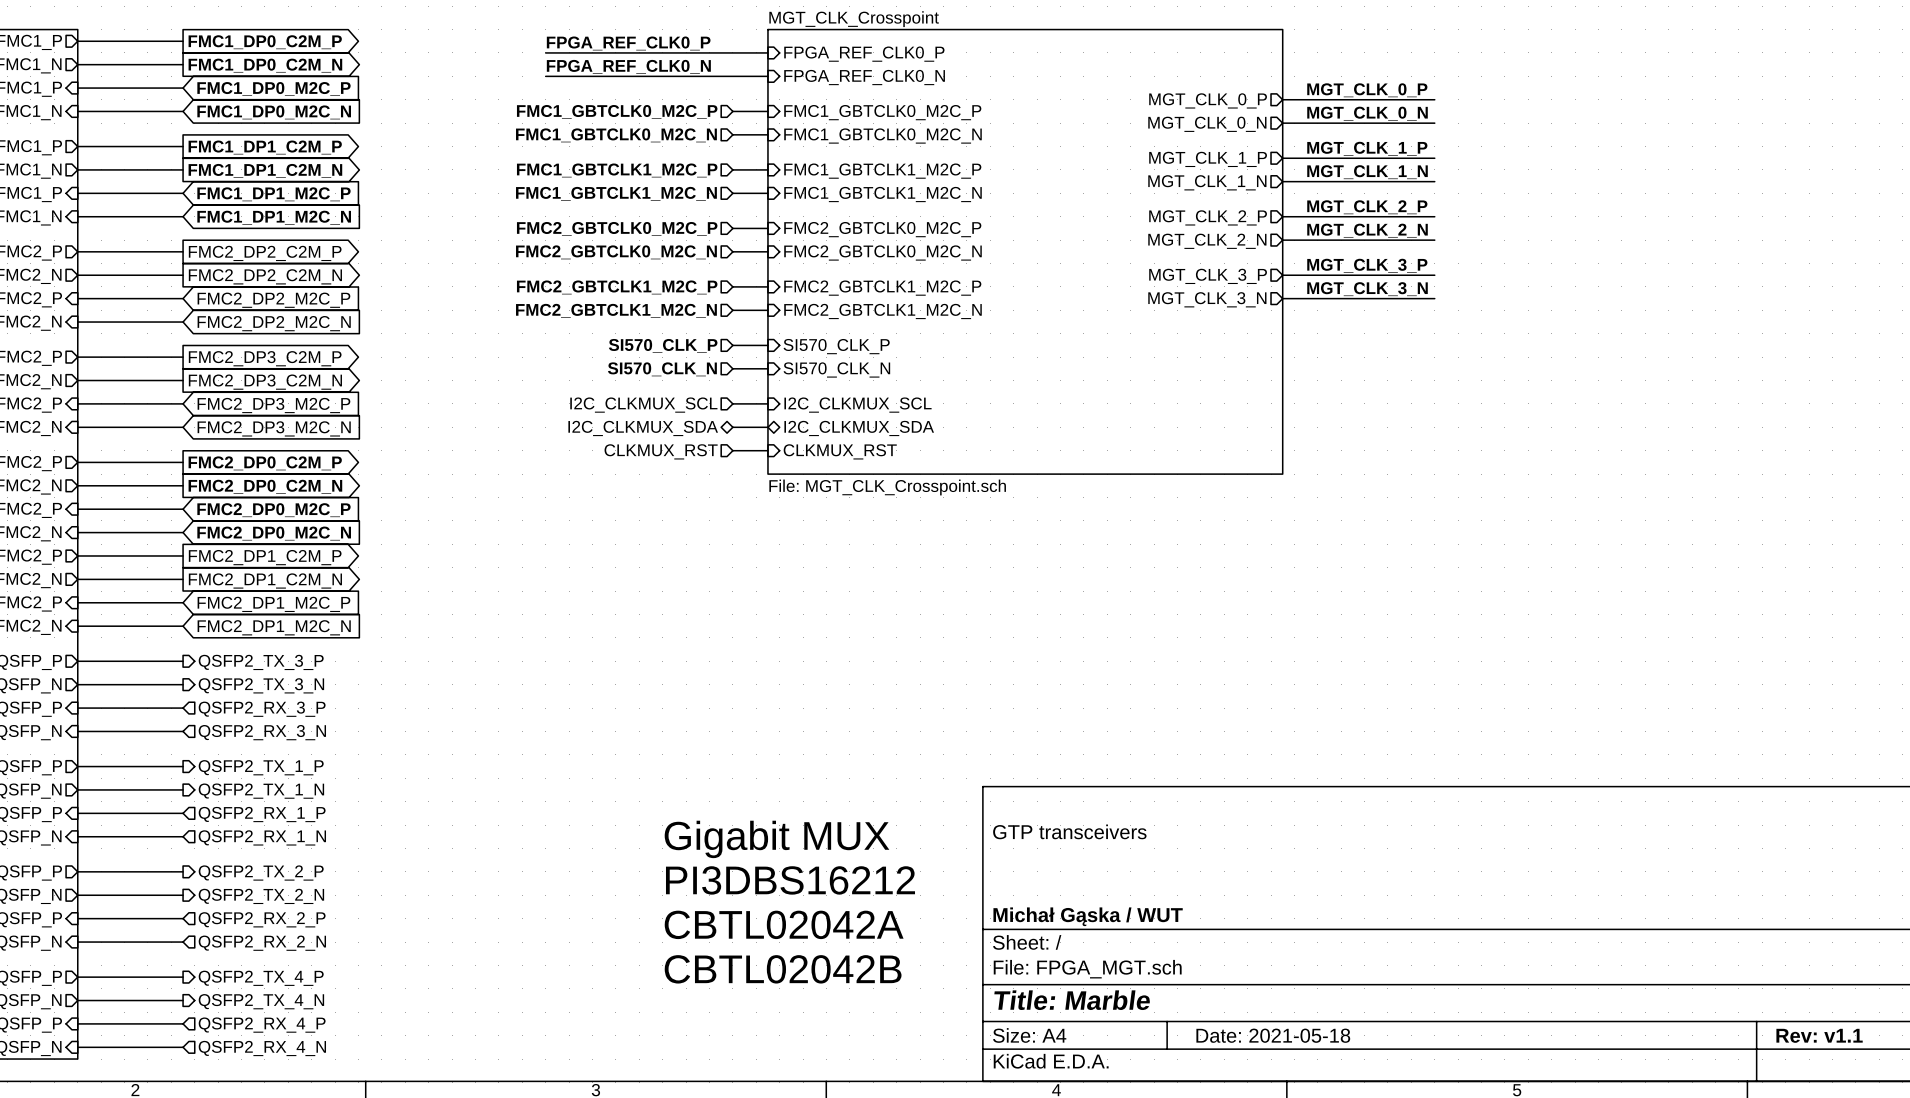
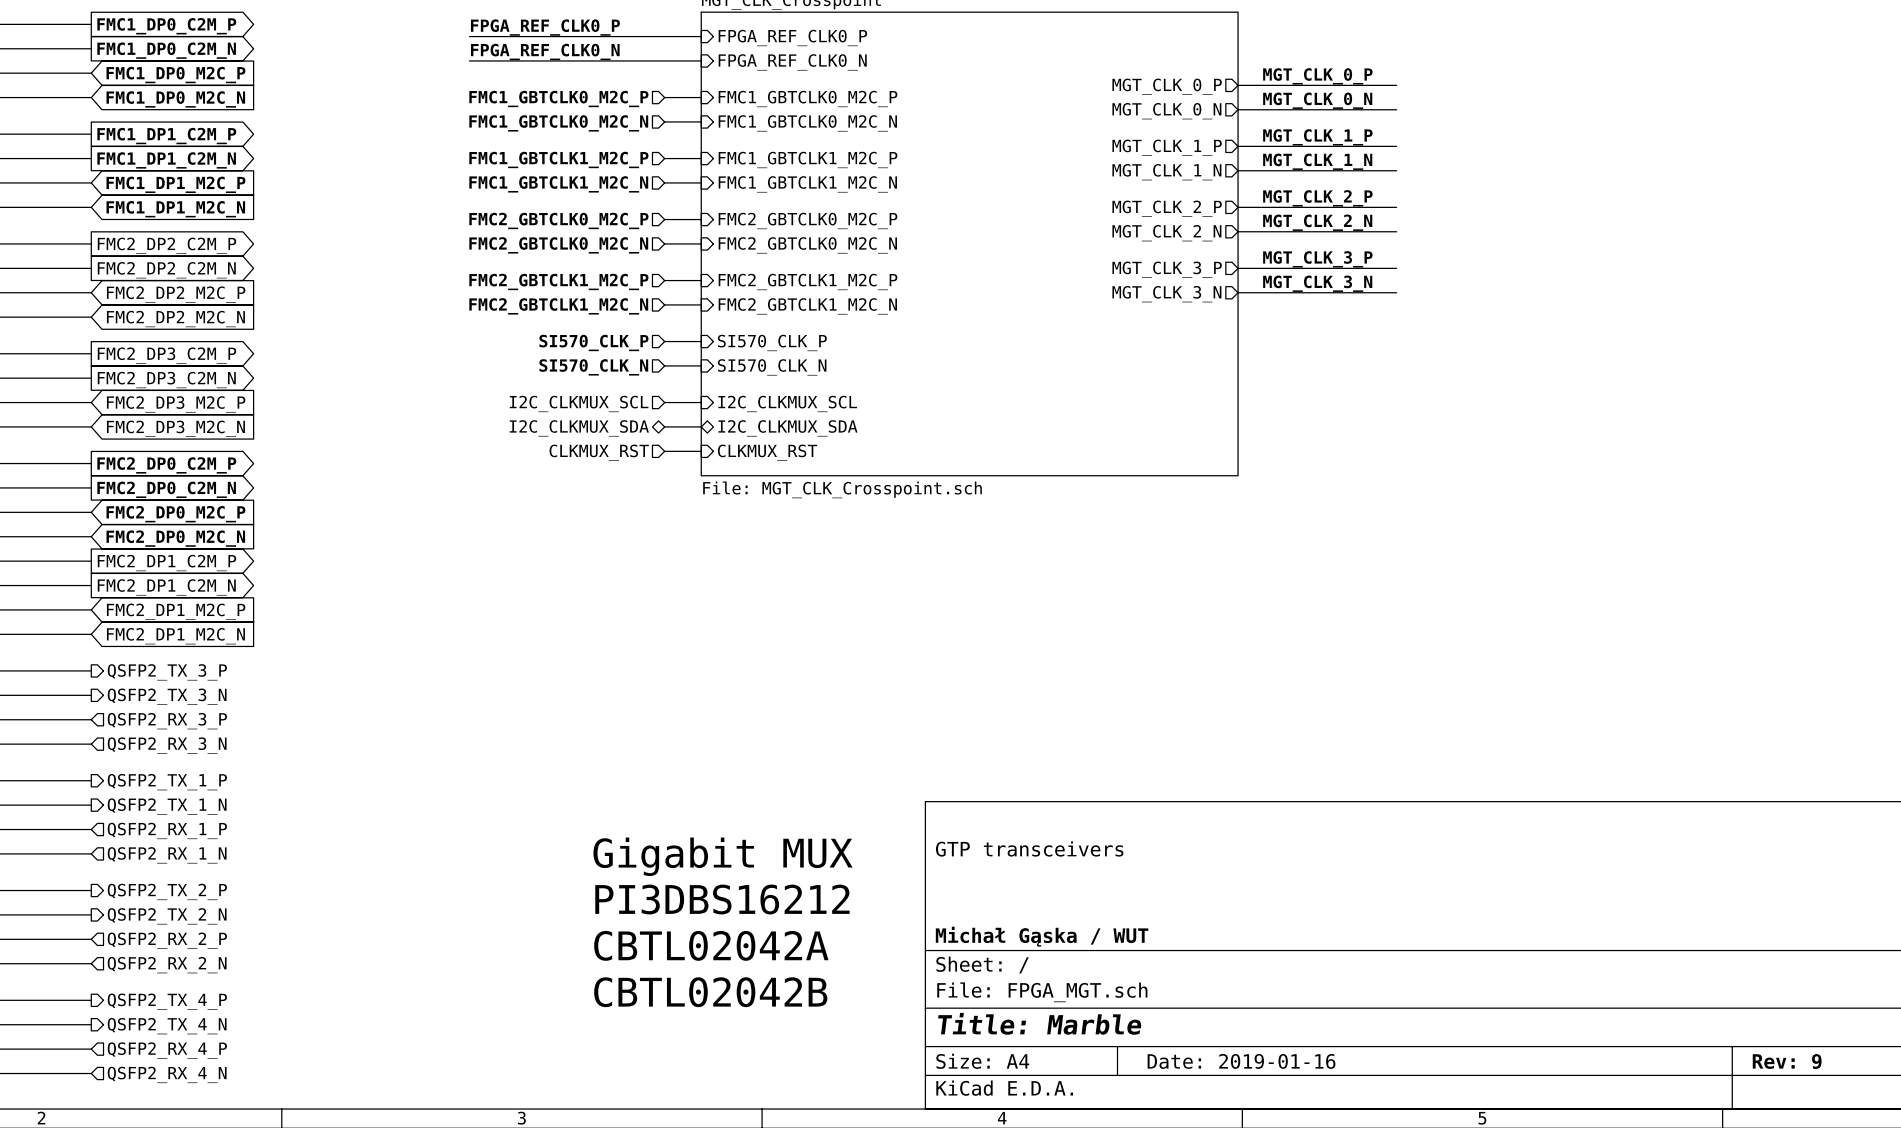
title block: Date: 2021-05-18 (1273, 1035) -> Date: 2019-01-16 (1241, 1061)
title block: Rev: v1.1 (1819, 1035) -> Rev: 9 (1787, 1061)

